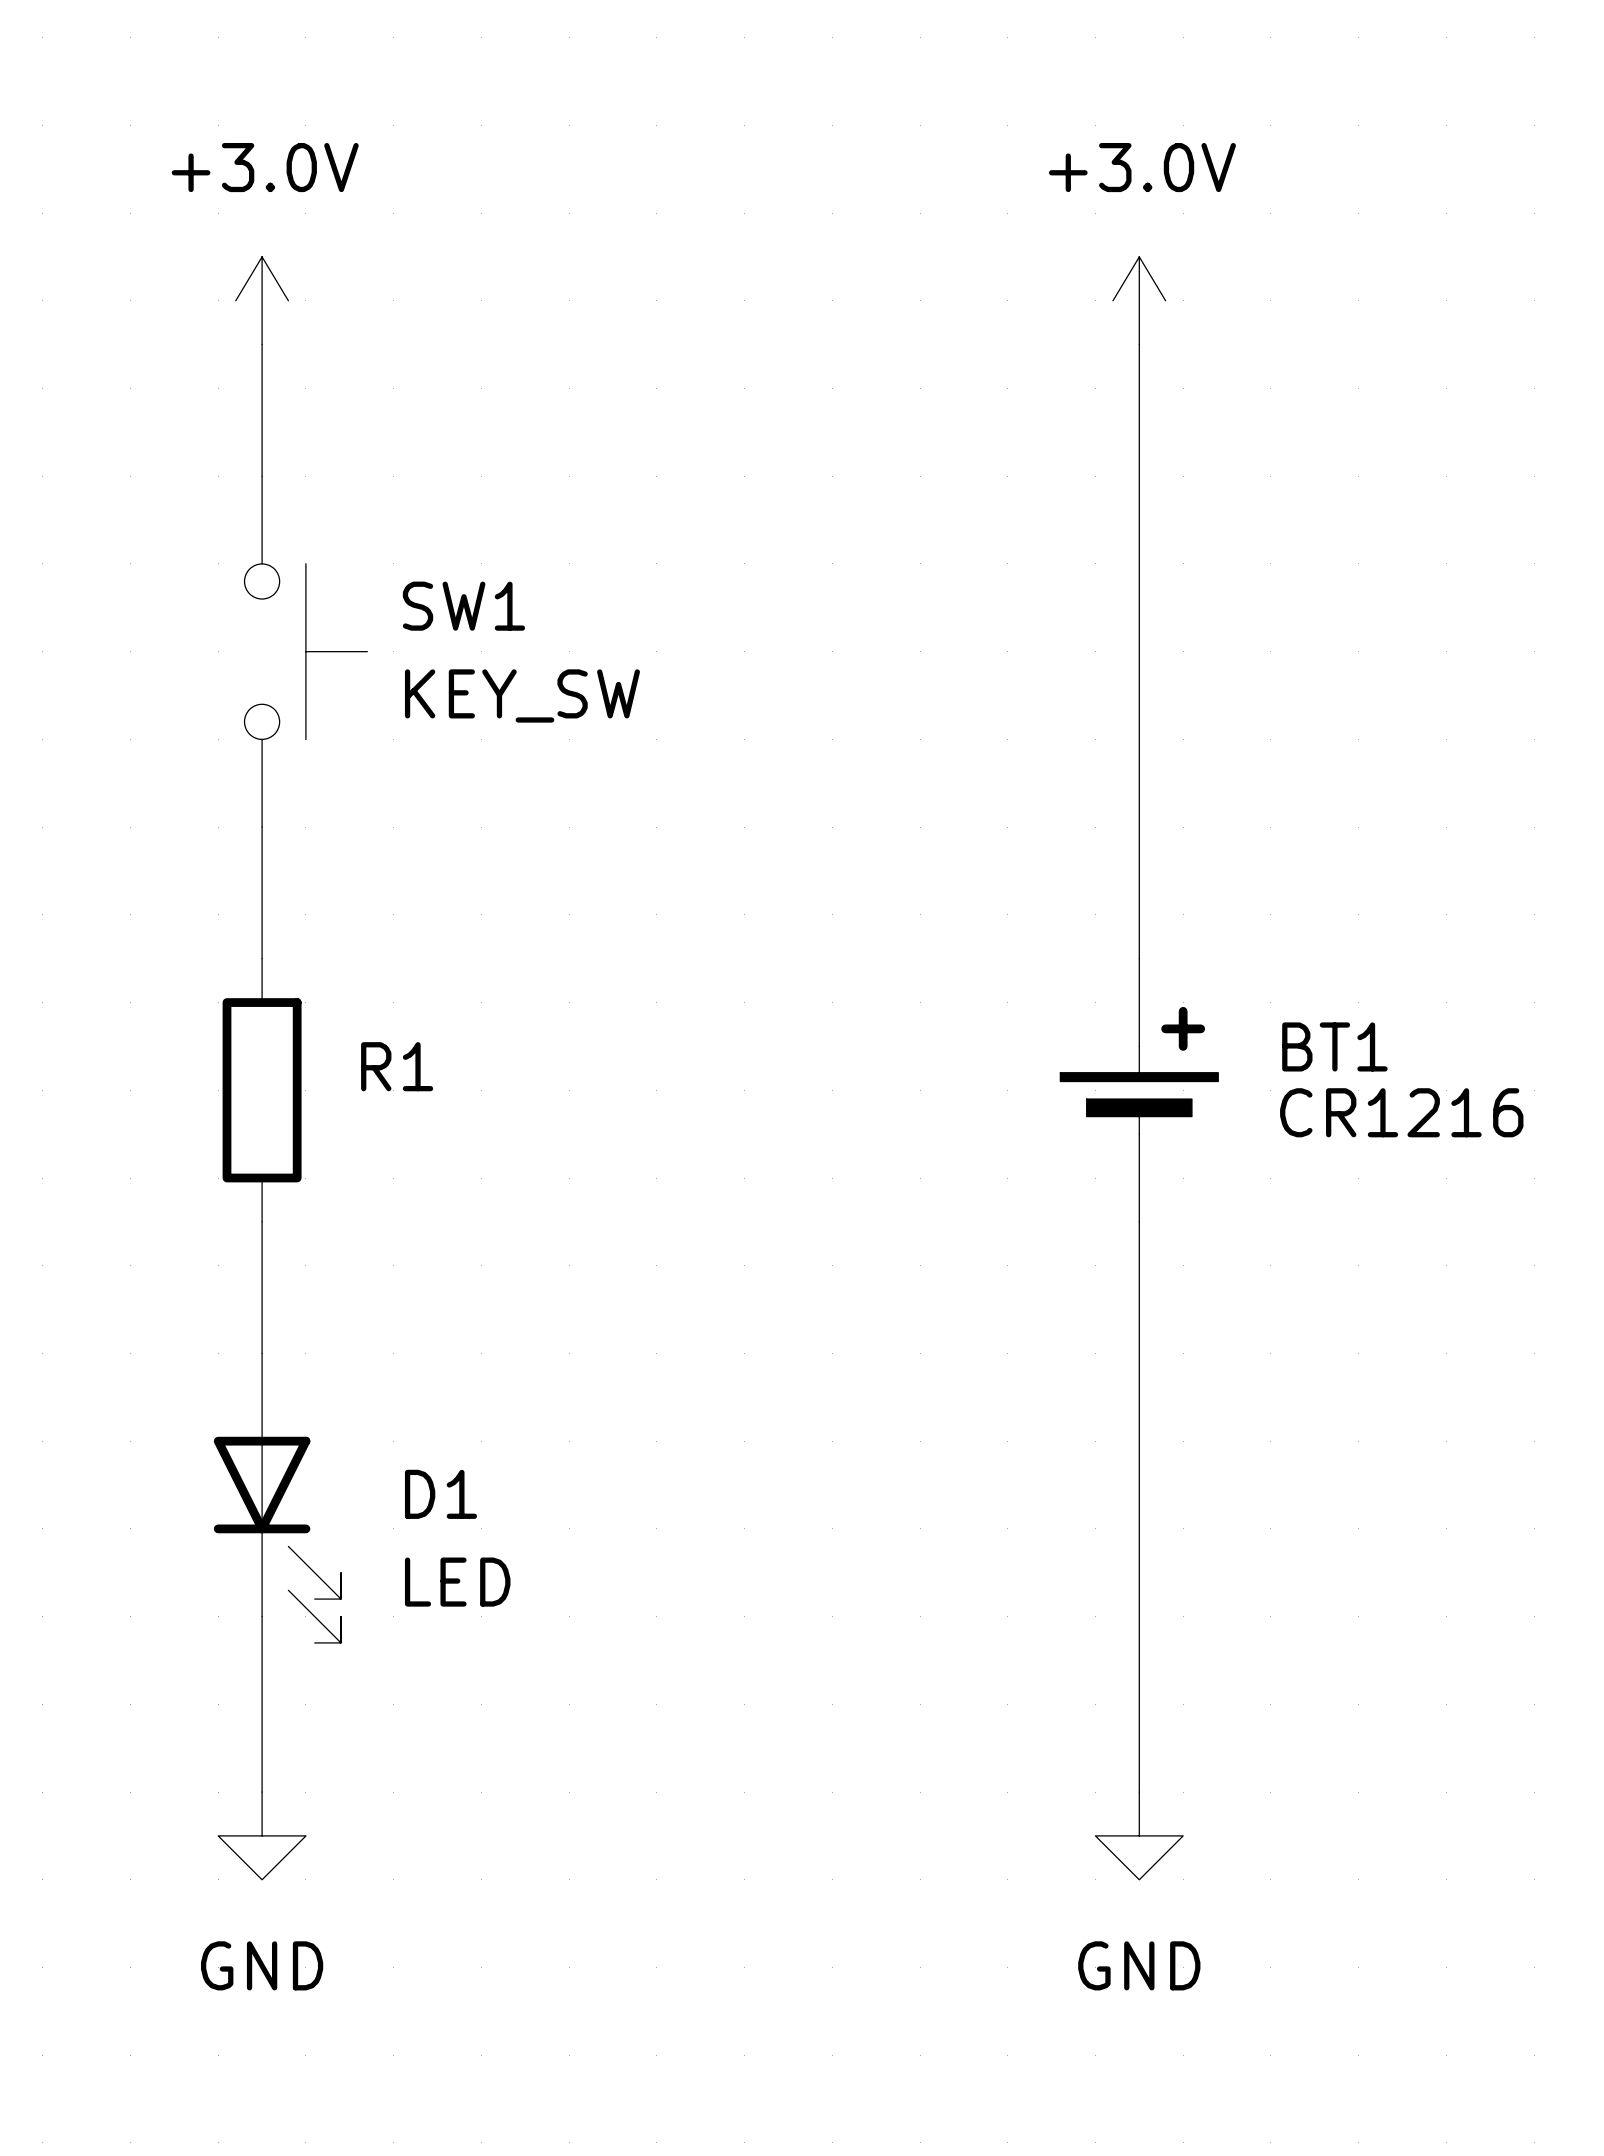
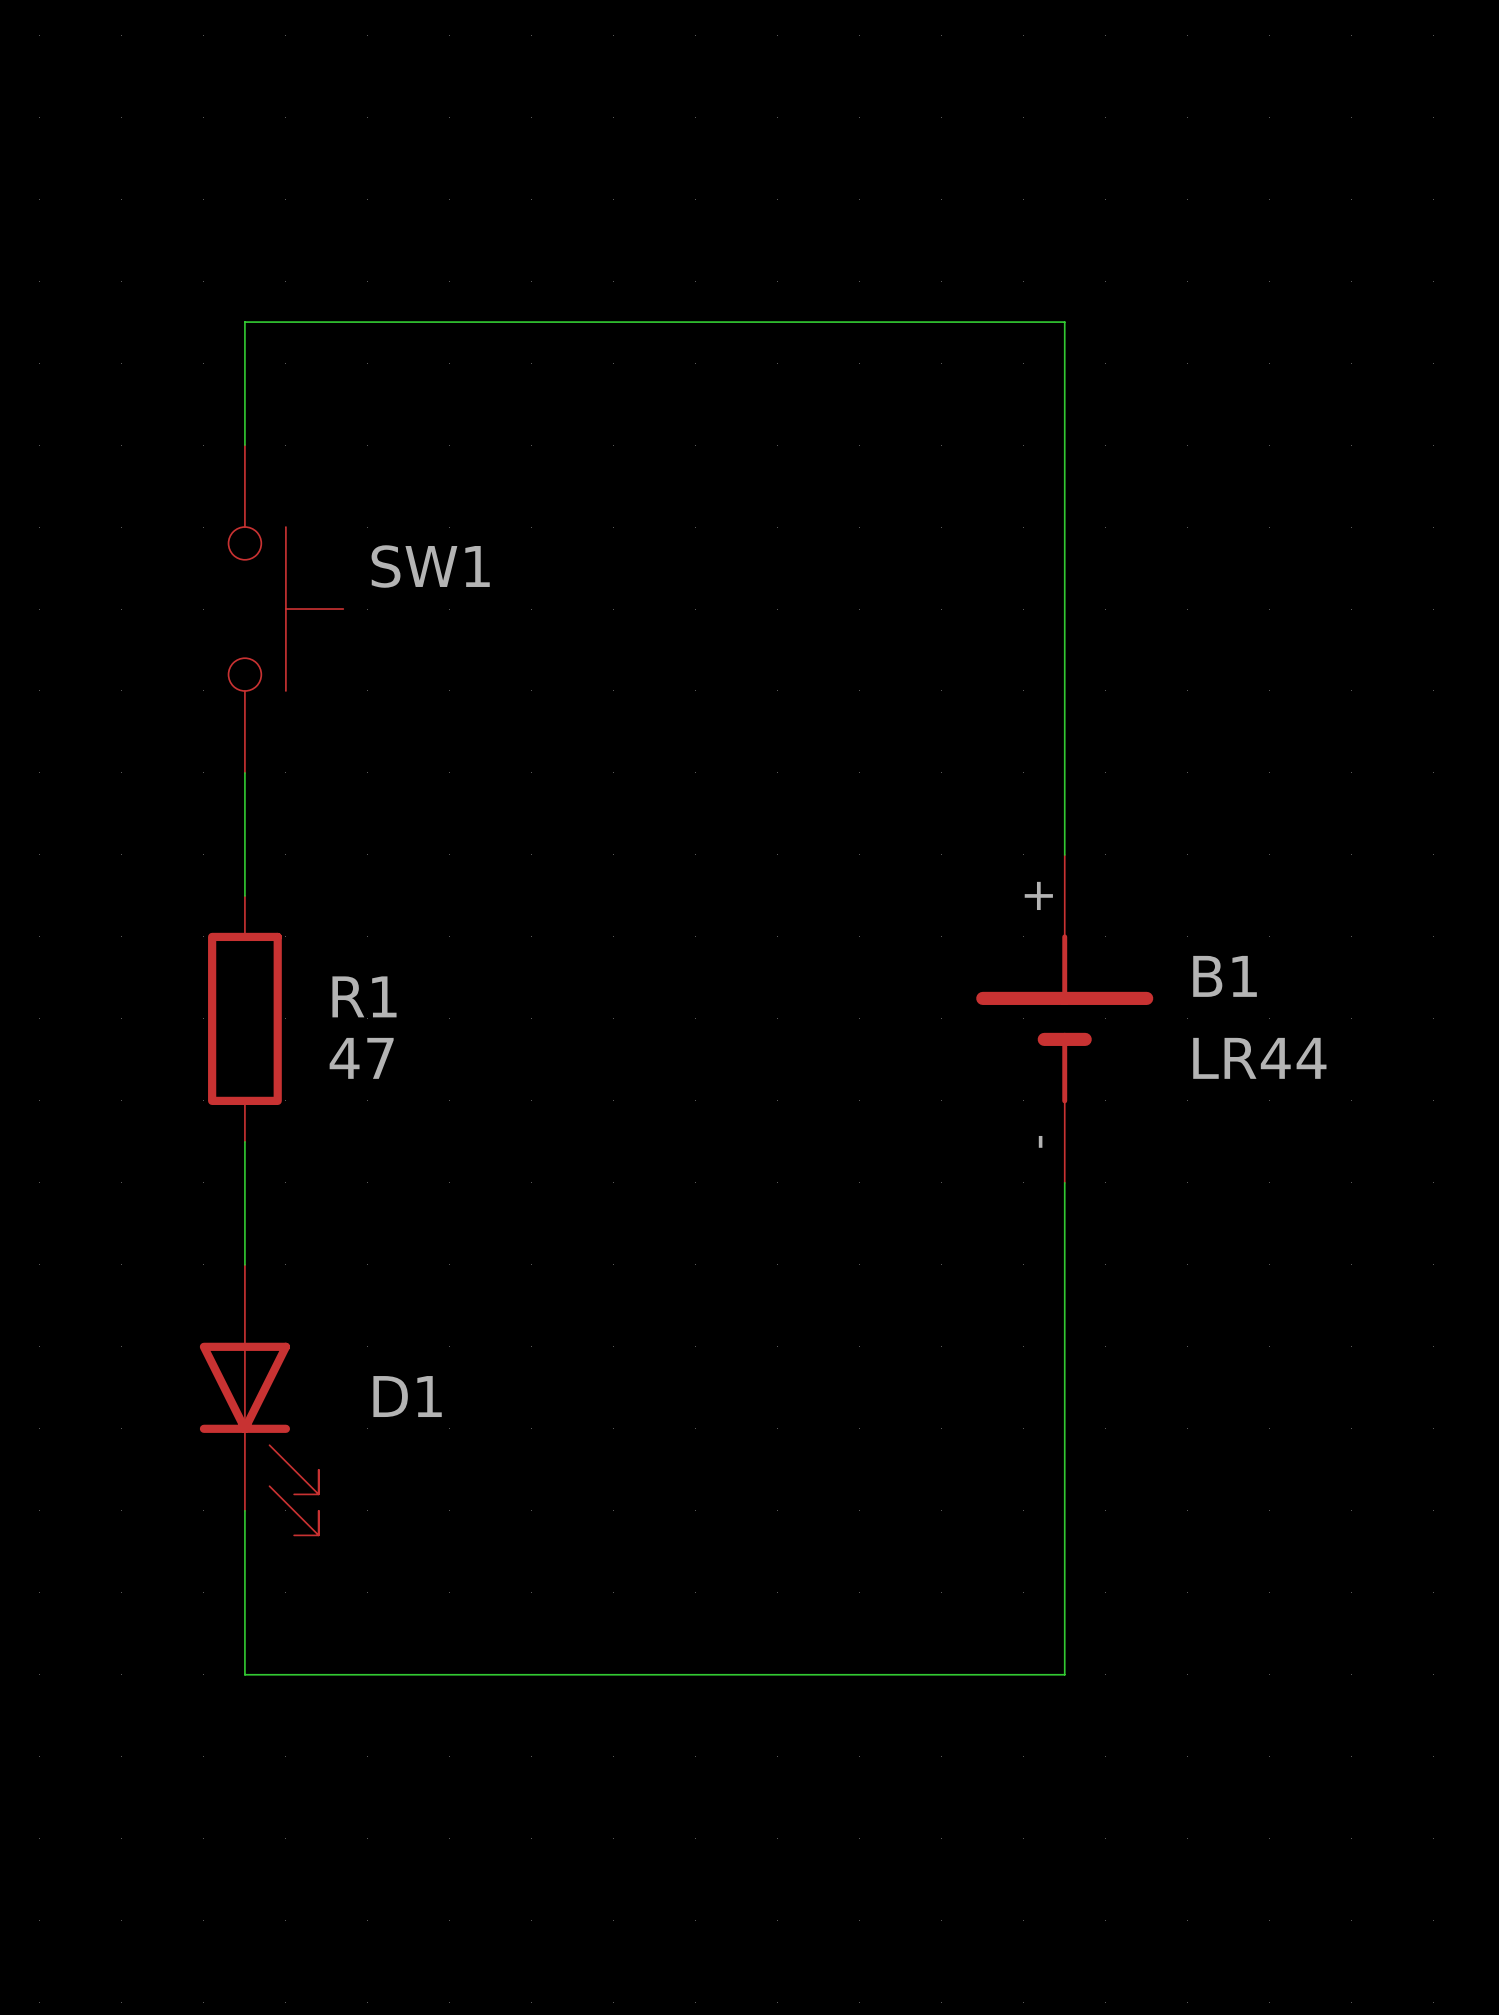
power symbol: +3.0V (262, 300) -> none
power symbol: +3.0V (1139, 300) -> none
wire: none -> (244, 322) (1064, 322)
SW1 value: KEY_SW (522, 695) -> none
BT1: CR1216 (1139, 1090) -> none
B1: none -> LR44 (1064, 1018)
R1 value: none -> 47 (361, 1058)
D1 value: LED (457, 1582) -> none
wire: none -> (244, 1674) (1064, 1674)
power symbol: GND (262, 1835) -> none
power symbol: GND (1139, 1835) -> none

